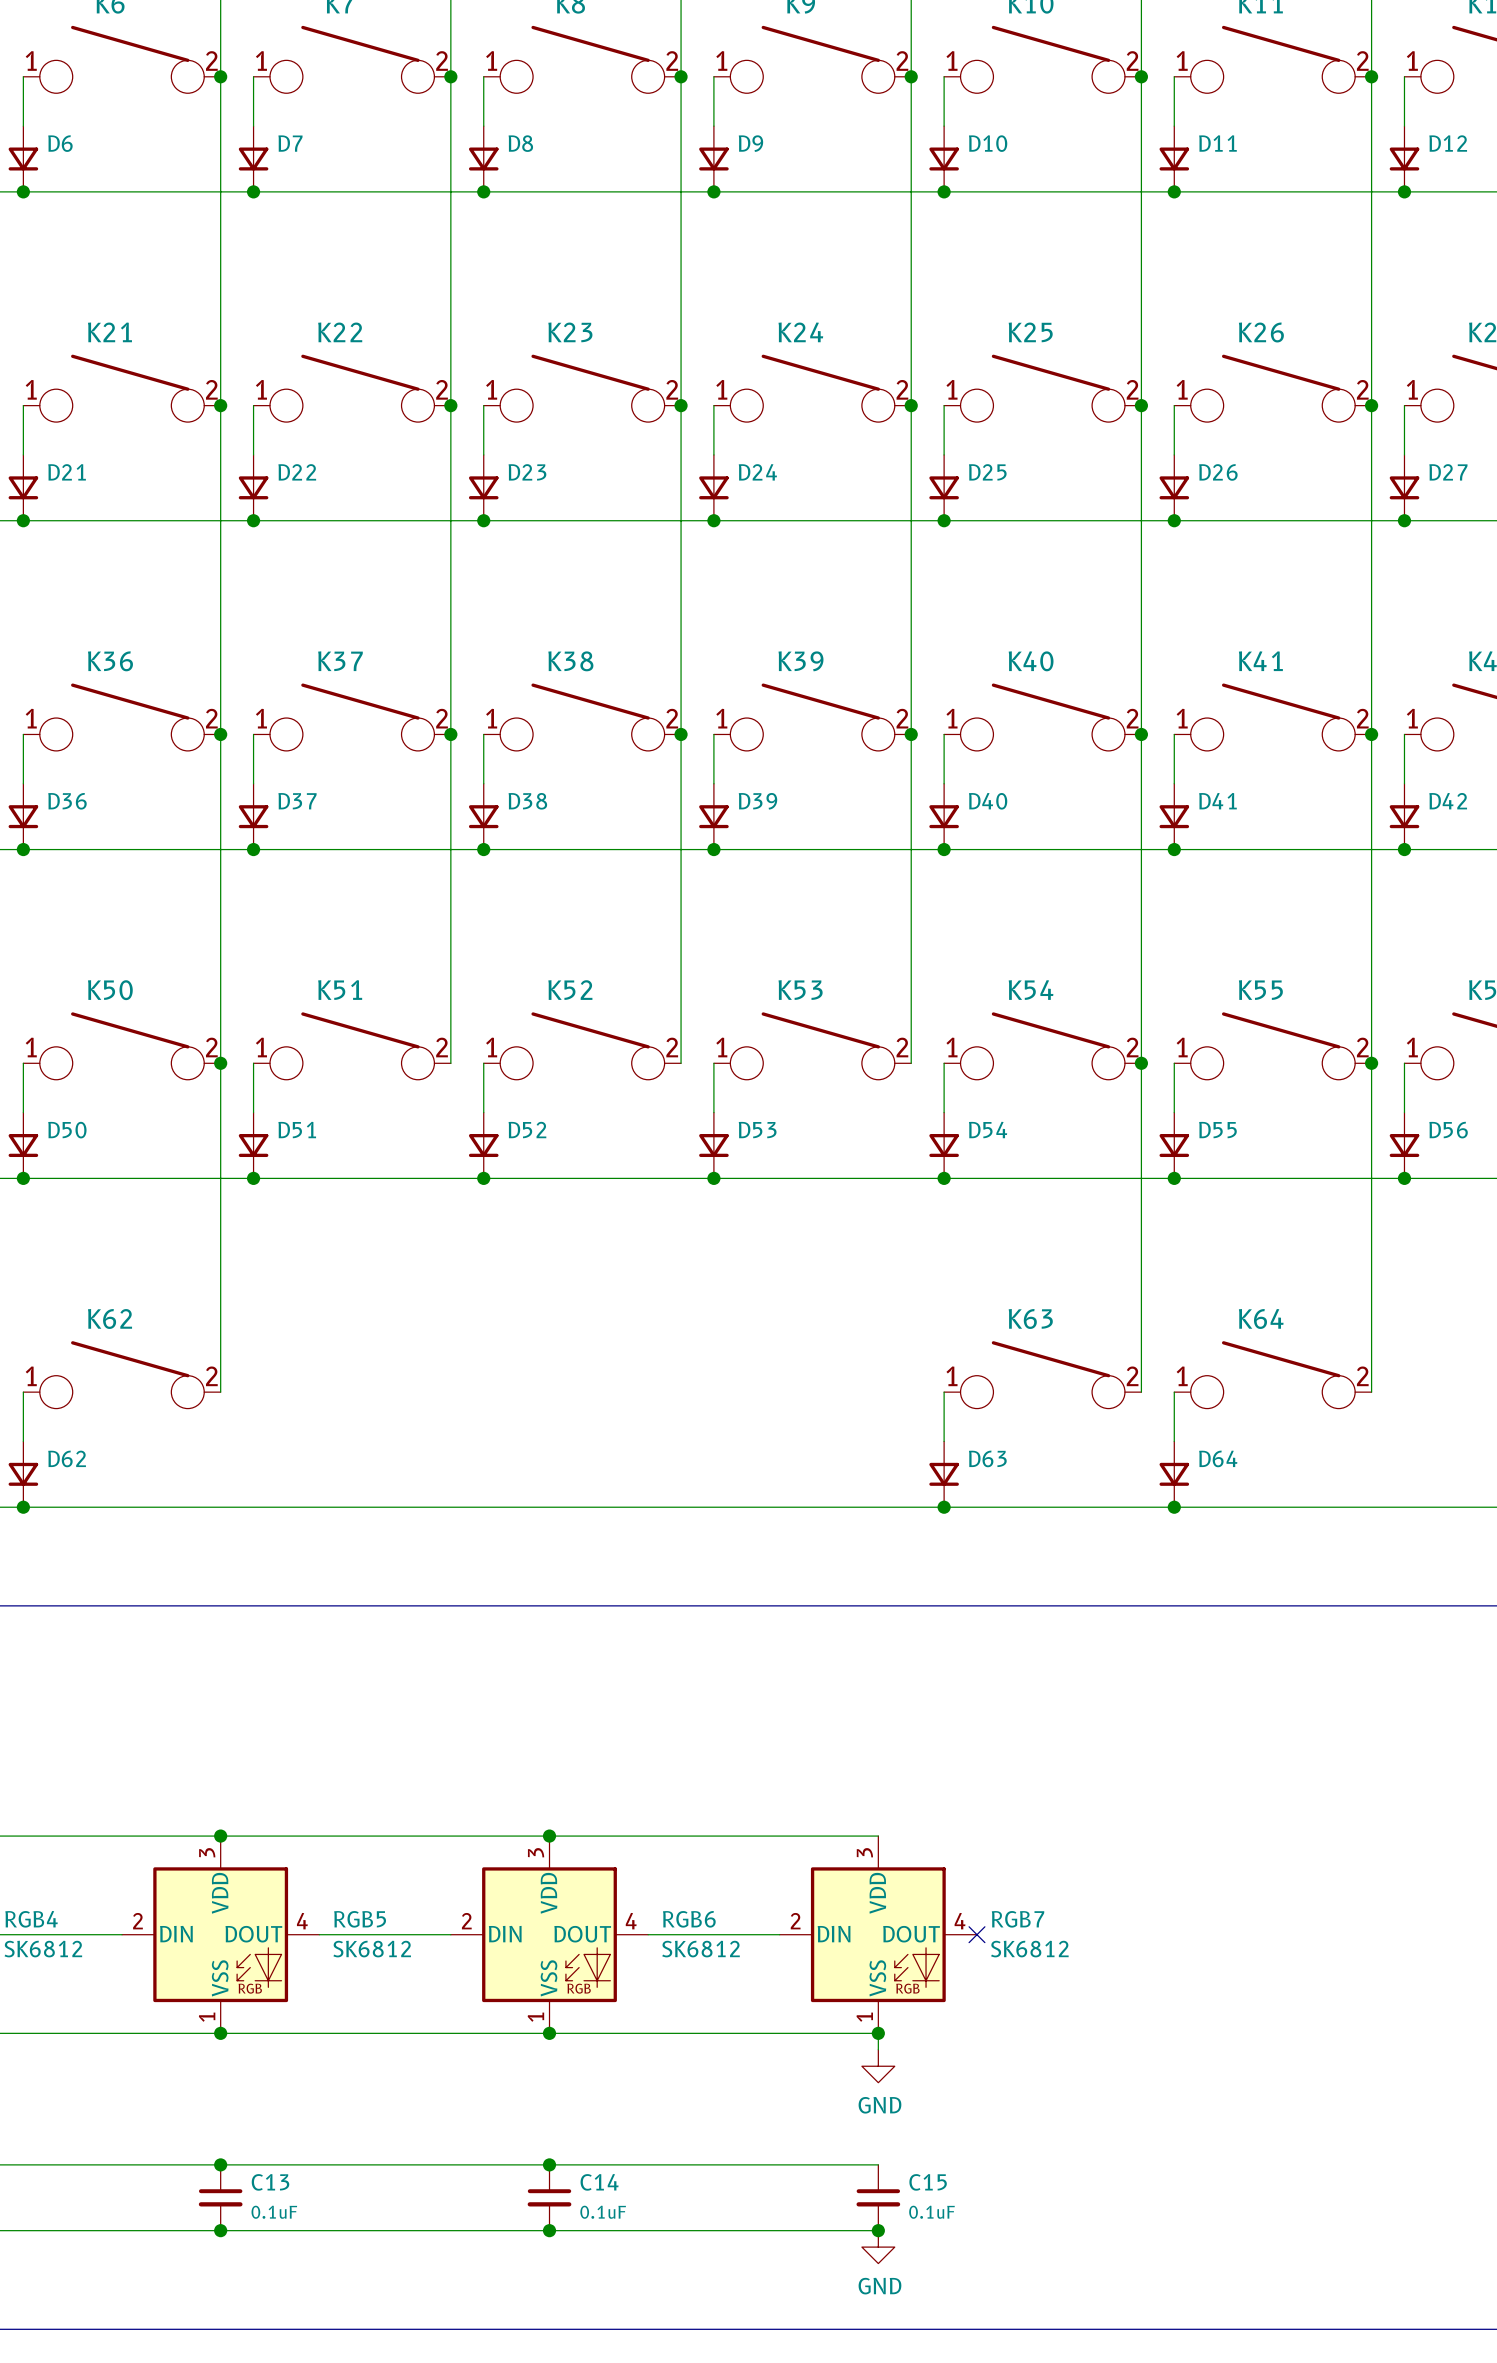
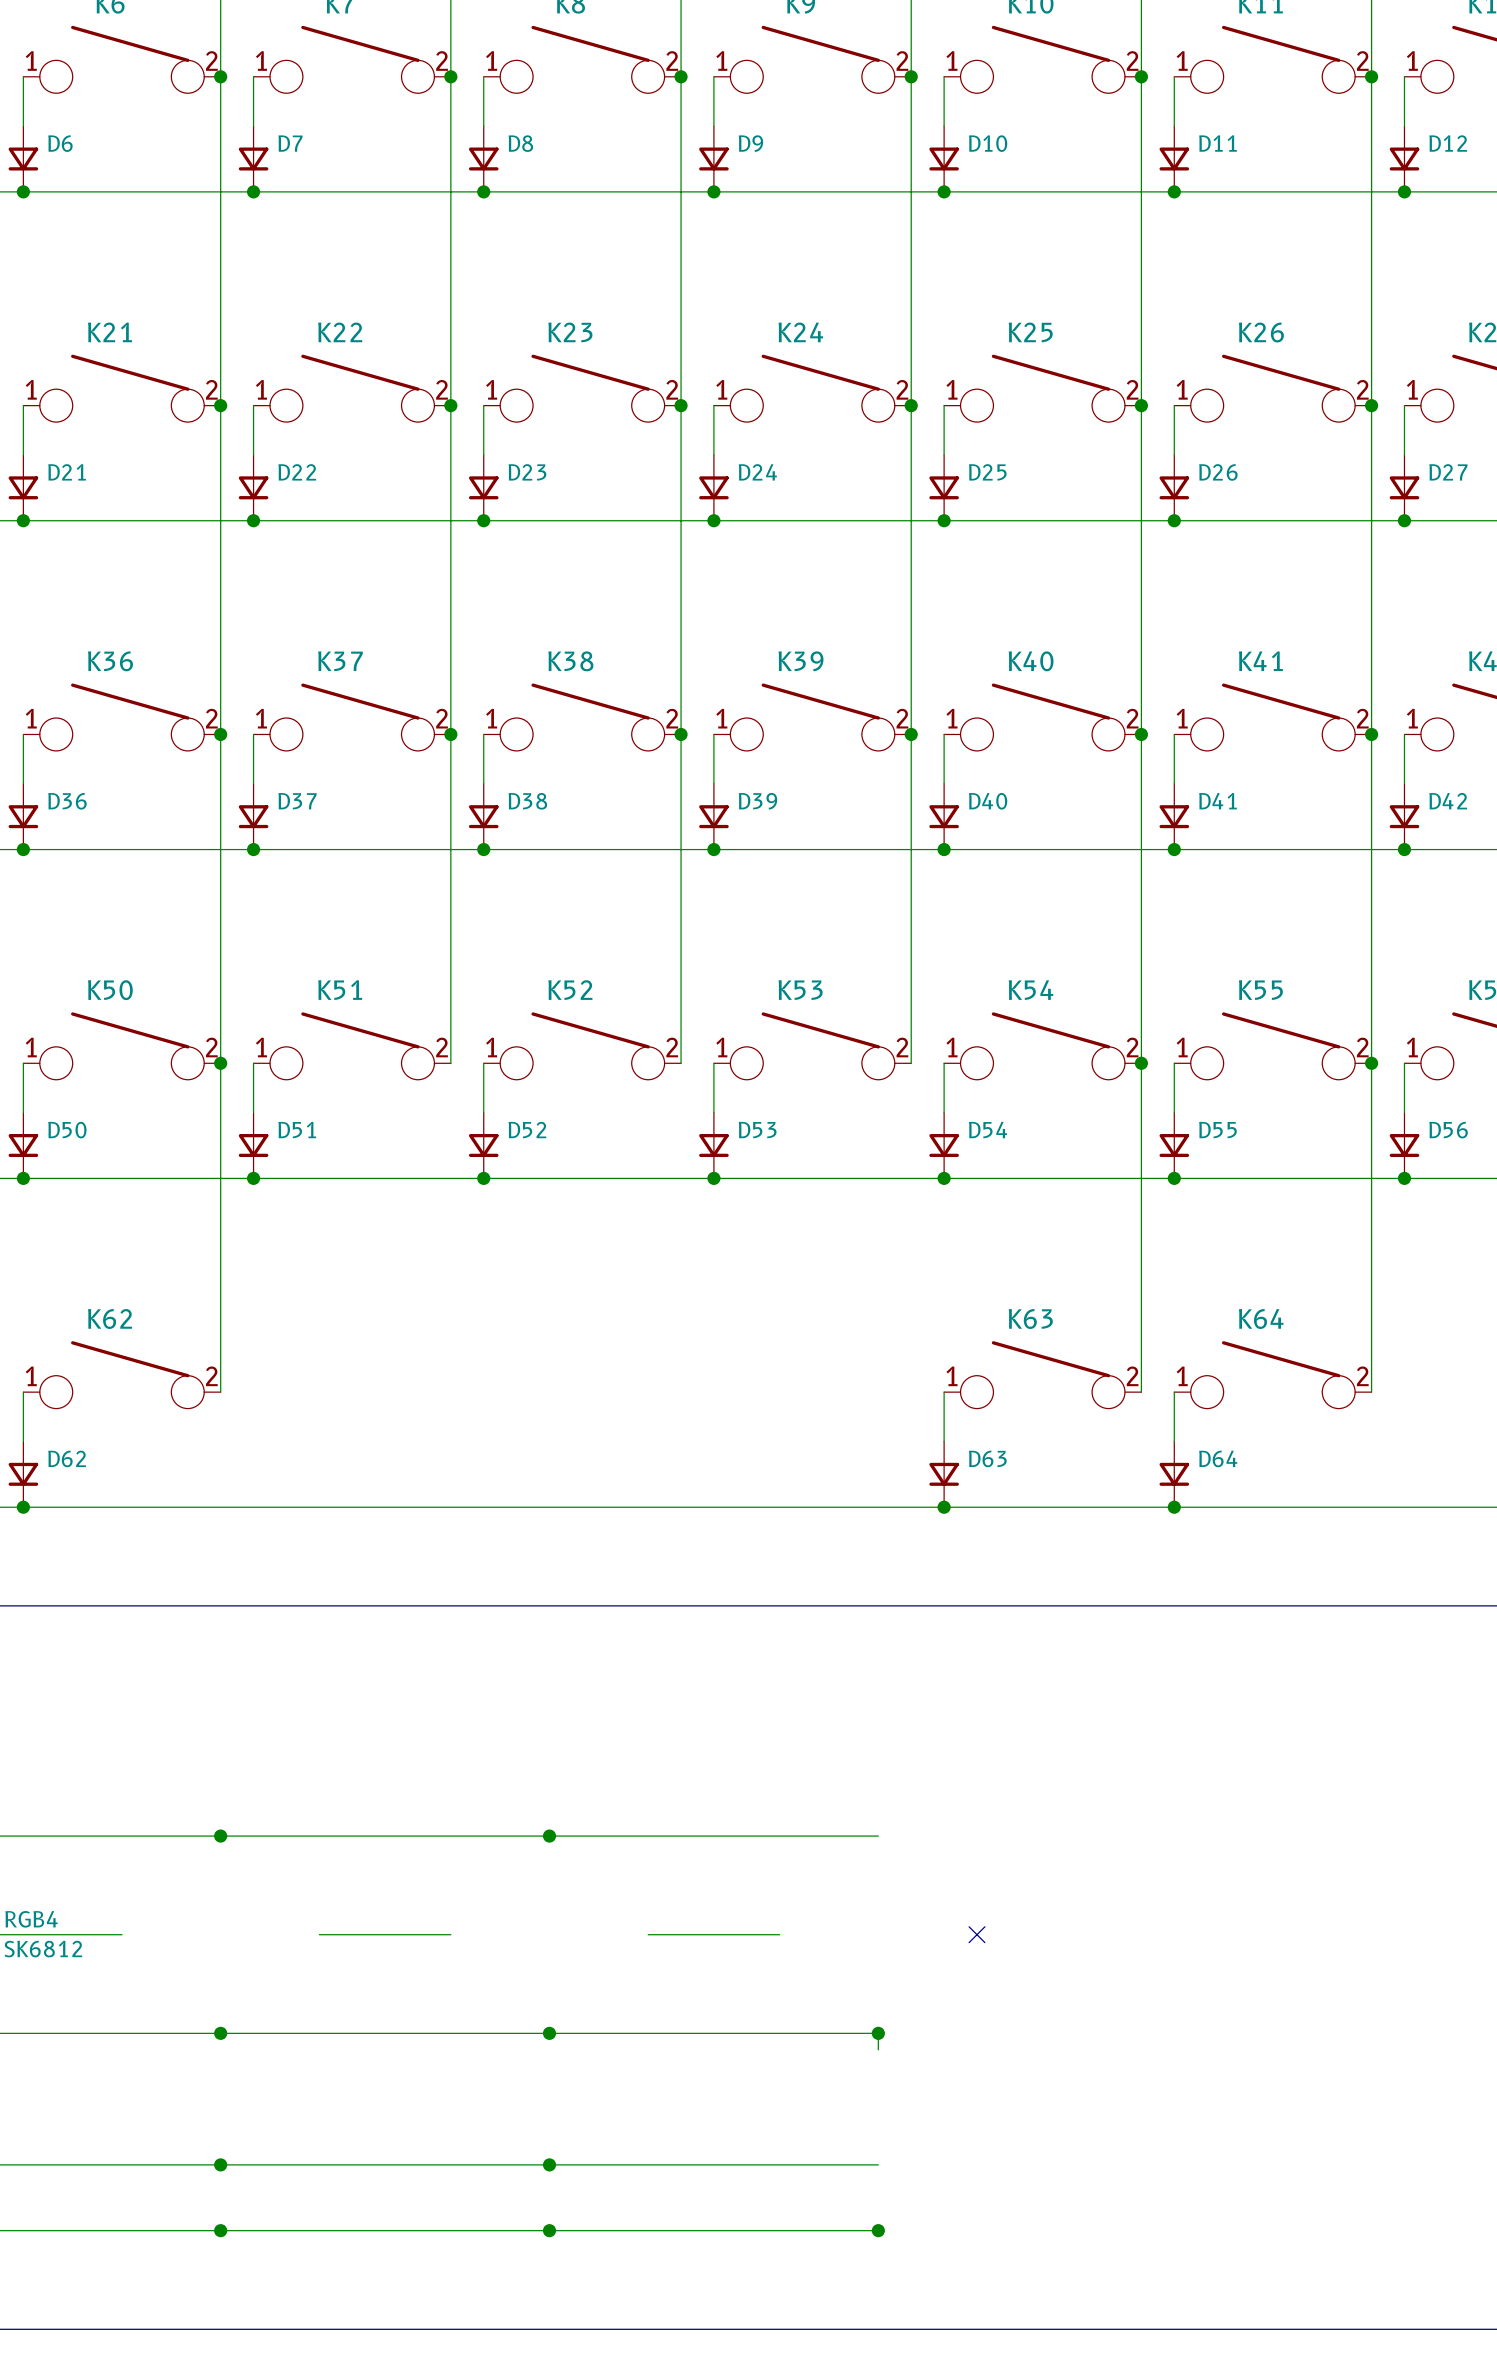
RGB5: SK6812 (220, 1934) -> none
RGB6: SK6812 (549, 1934) -> none
RGB7: SK6812 (878, 1934) -> none
power symbol: GND (878, 2066) -> none
C13: 0.1uF (220, 2197) -> none
C14: 0.1uF (549, 2197) -> none
C15: 0.1uF (878, 2197) -> none
power symbol: GND (878, 2247) -> none

